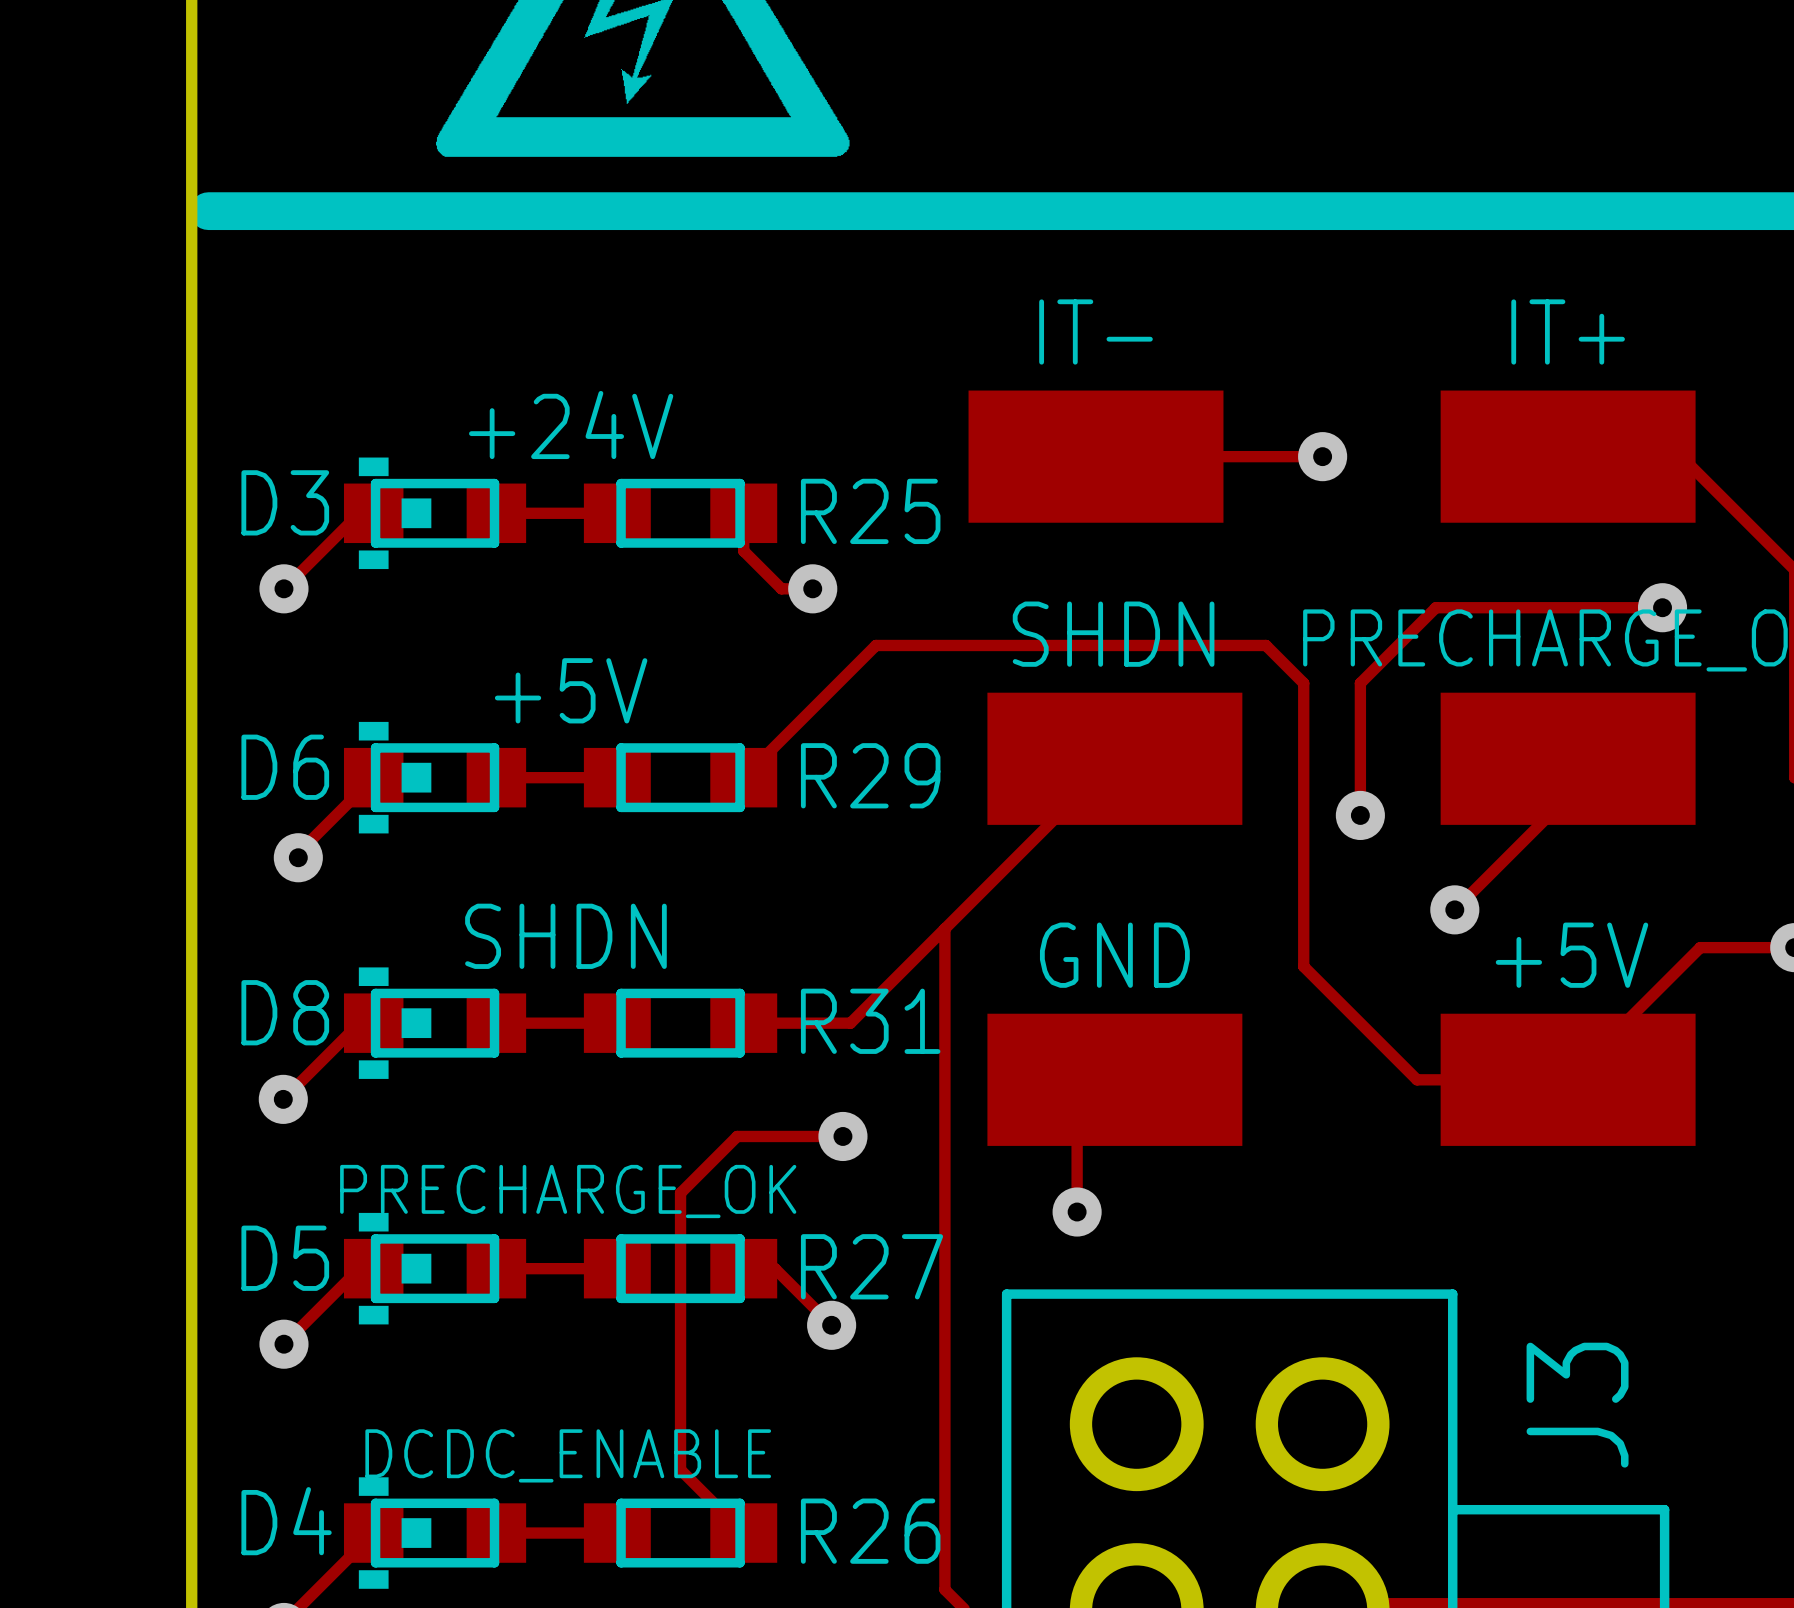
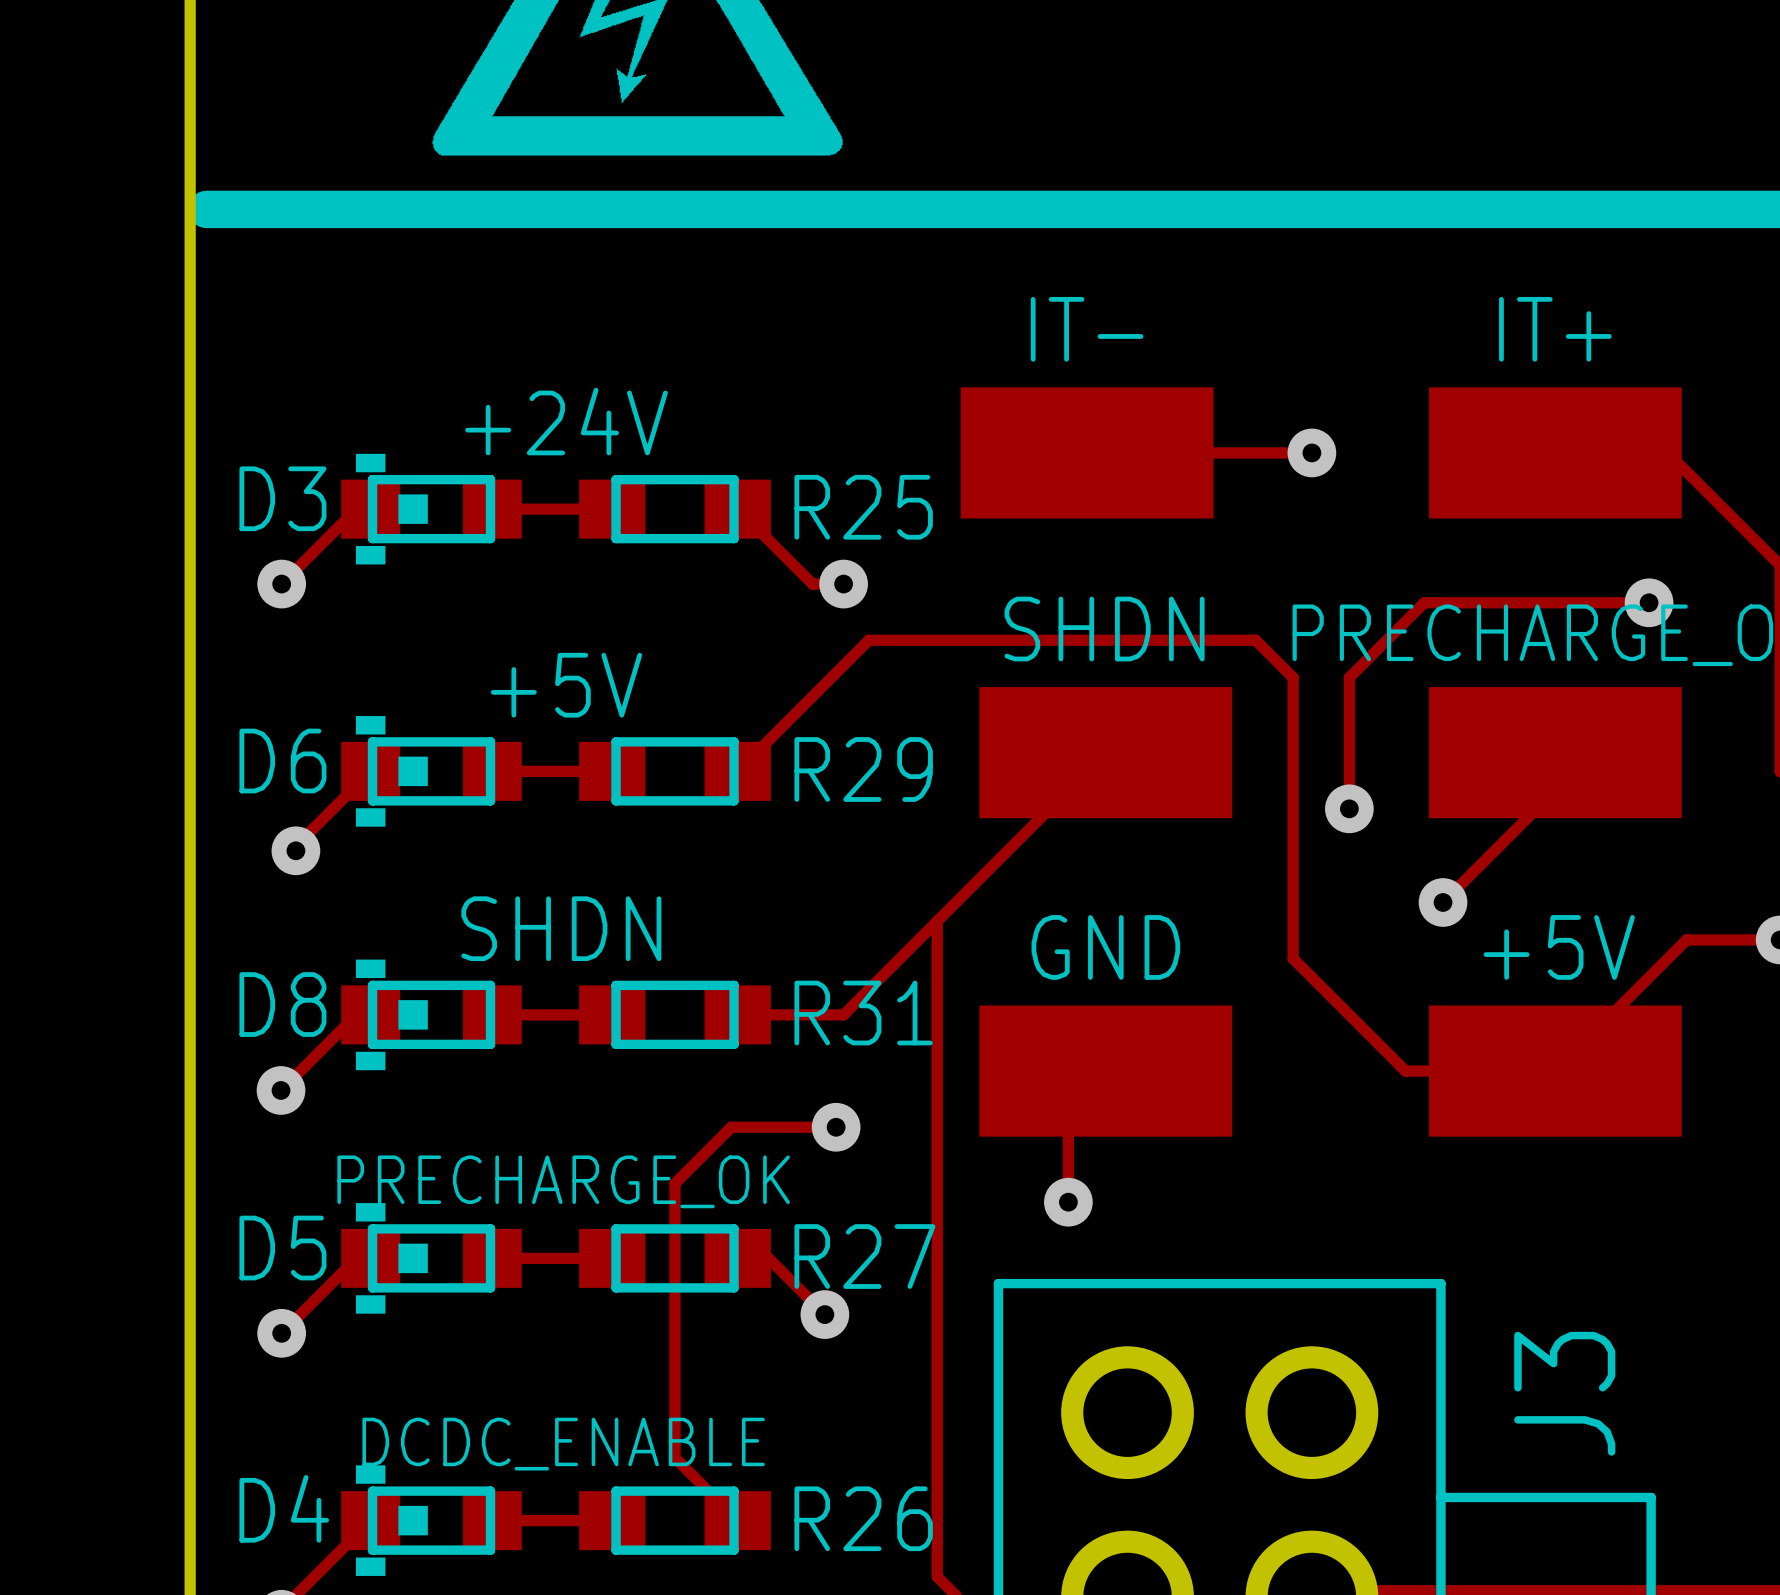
track: (743, 513) (743, 551) (781, 588) (812, 588) -> (737, 509) (812, 584) (843, 584)
via position: (812, 588) -> (843, 584)

